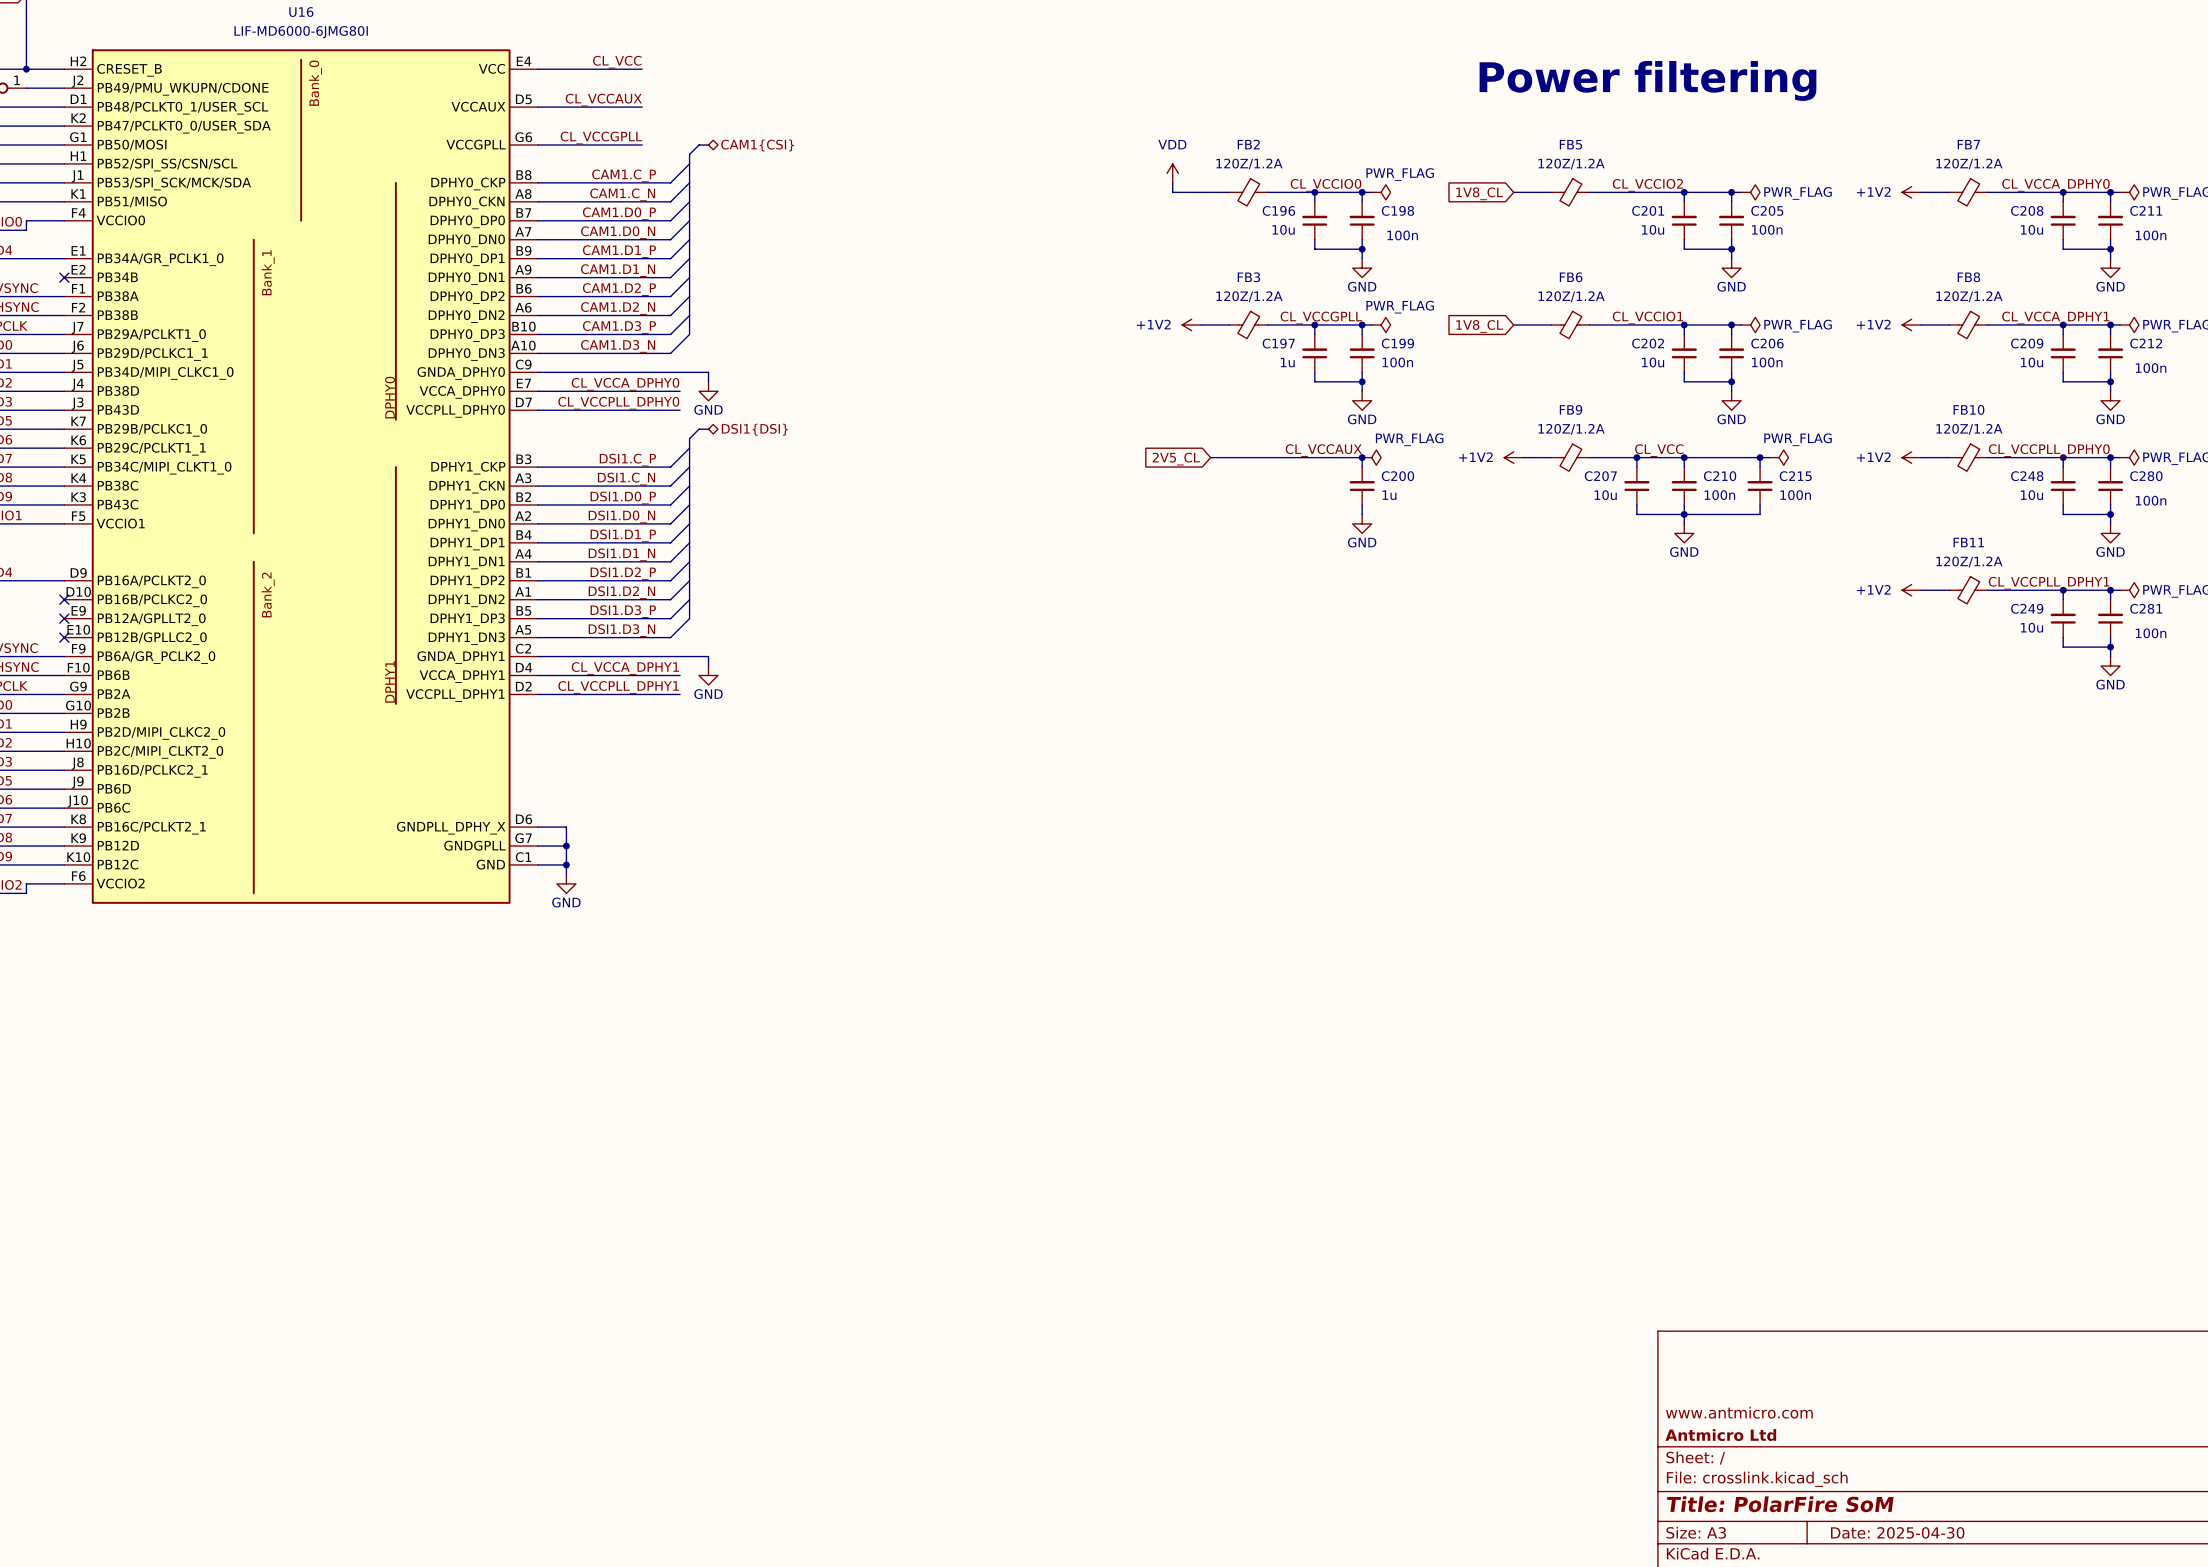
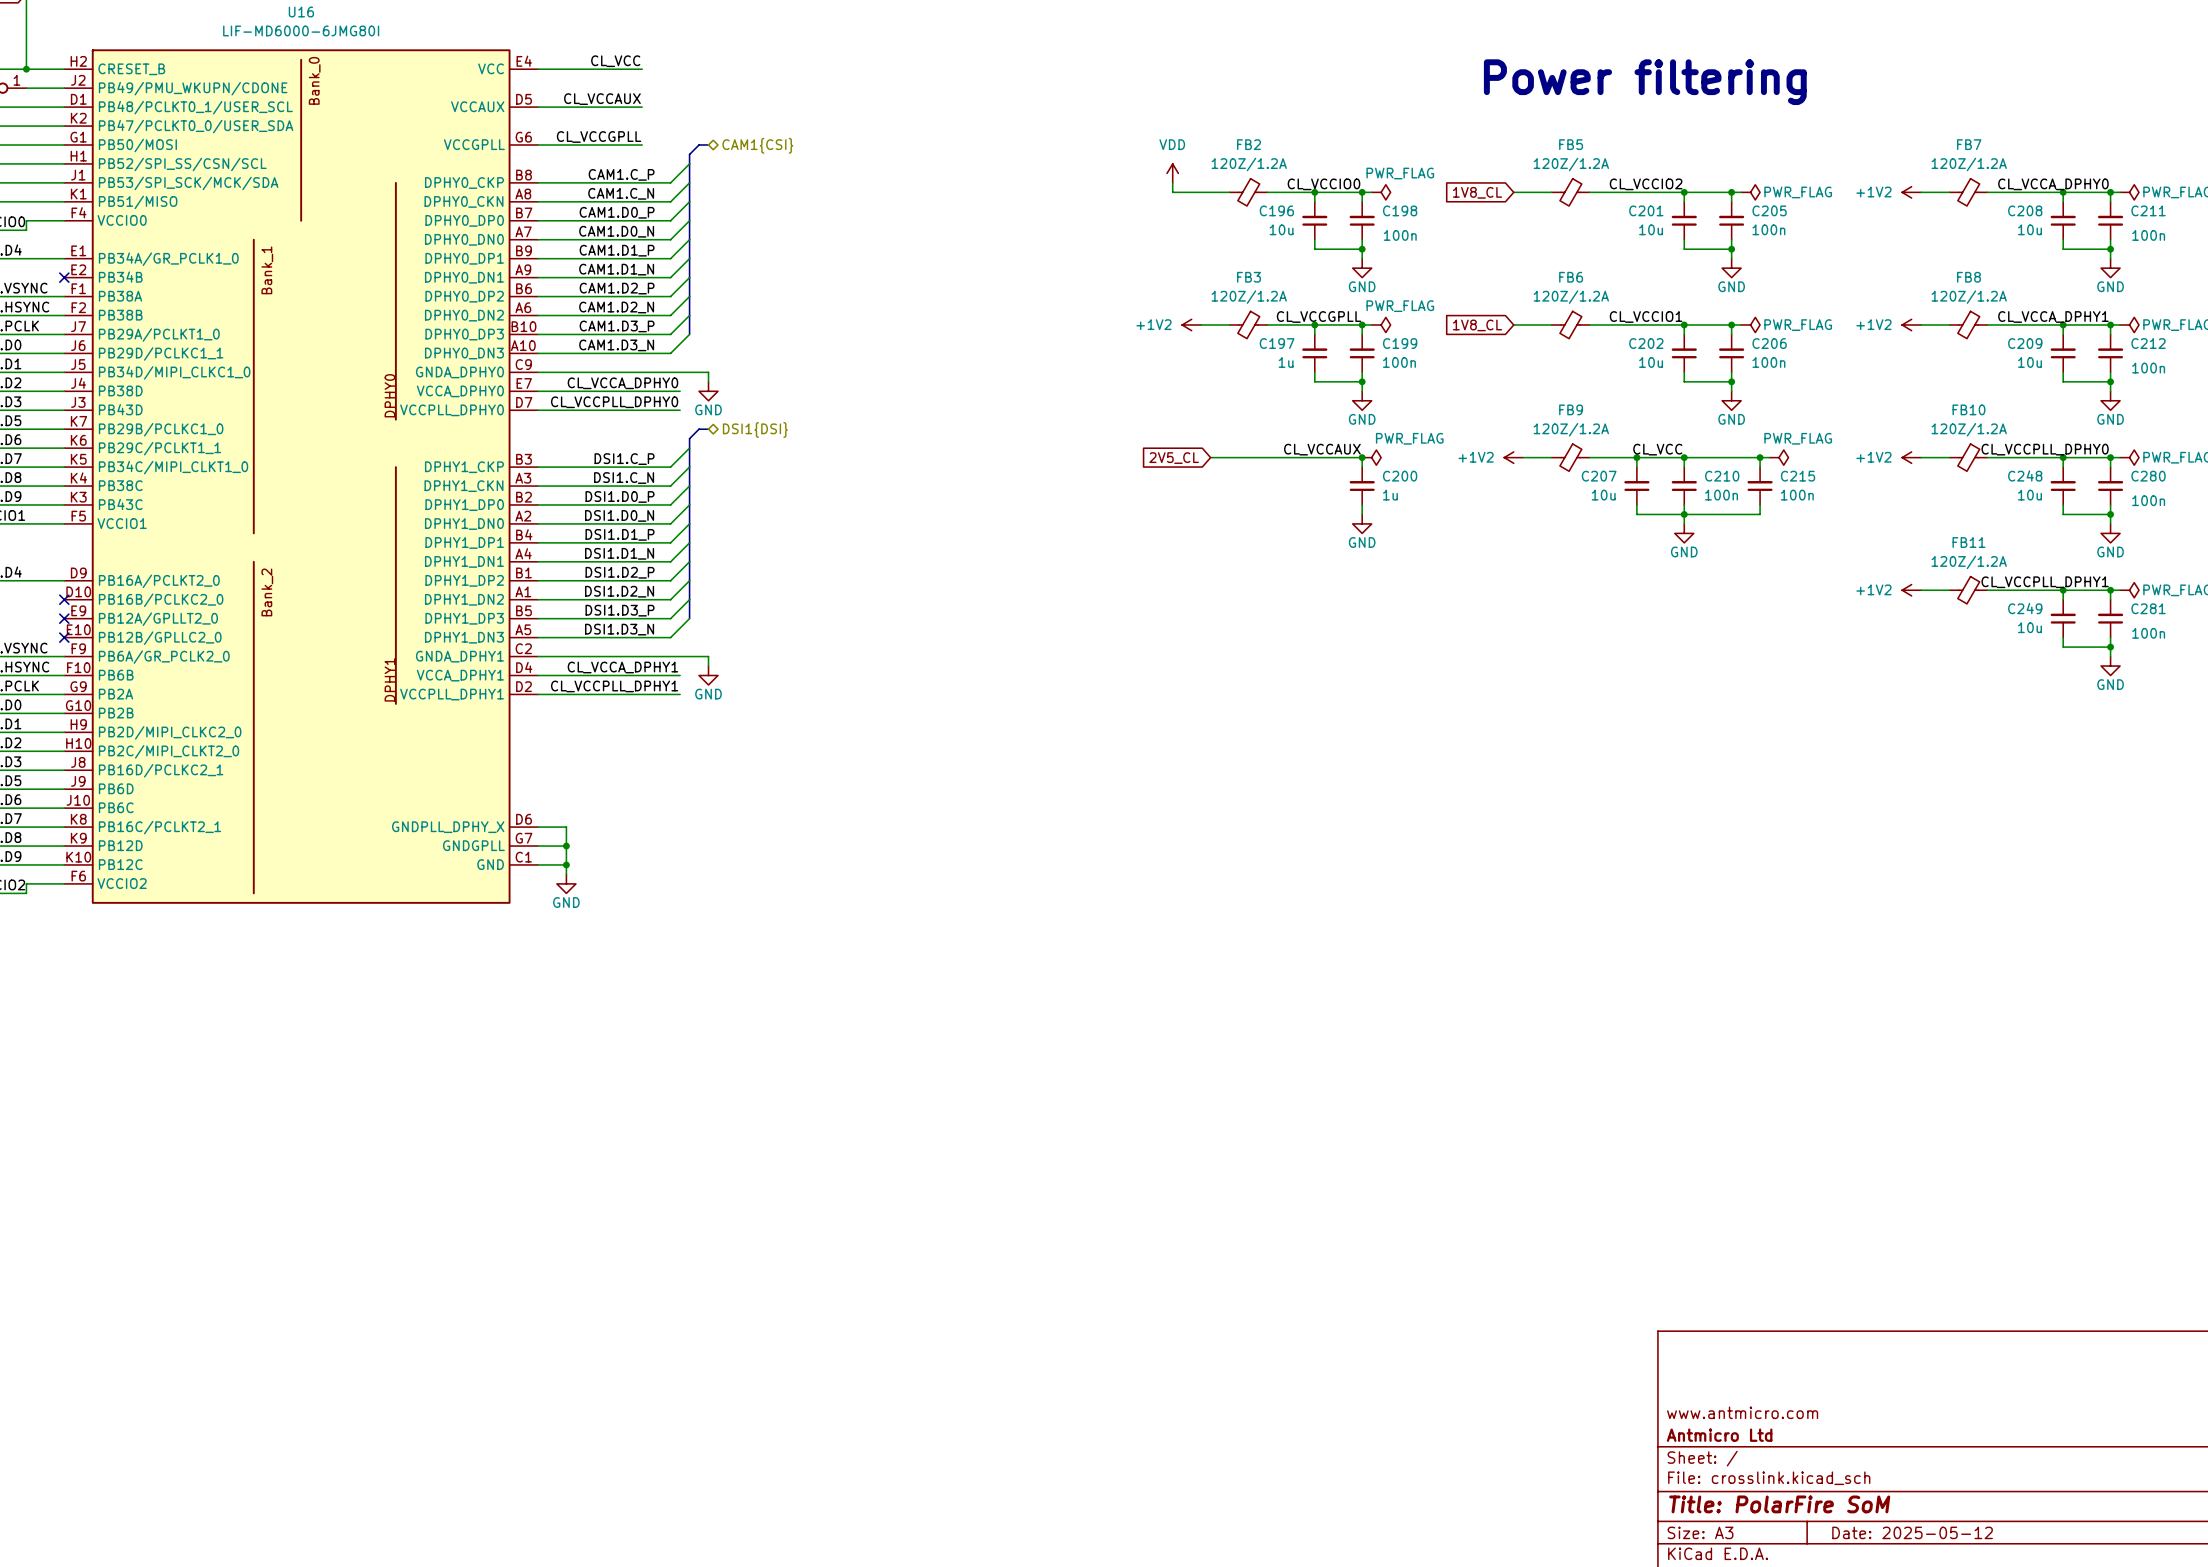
title block: Date: 2025-04-30 (1897, 1532) -> Date: 2025-05-12 (1912, 1532)

